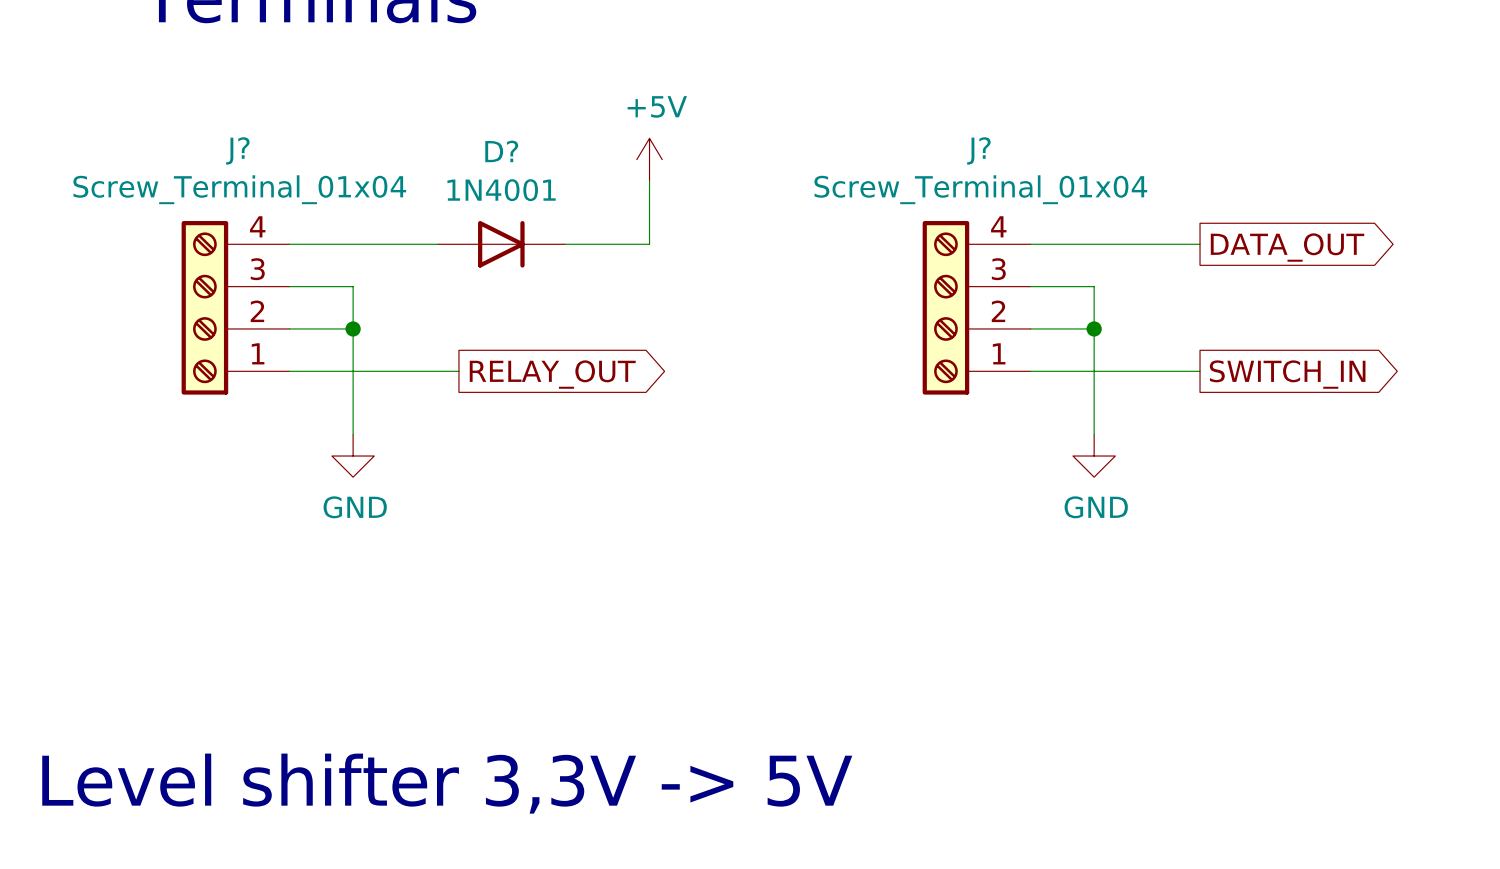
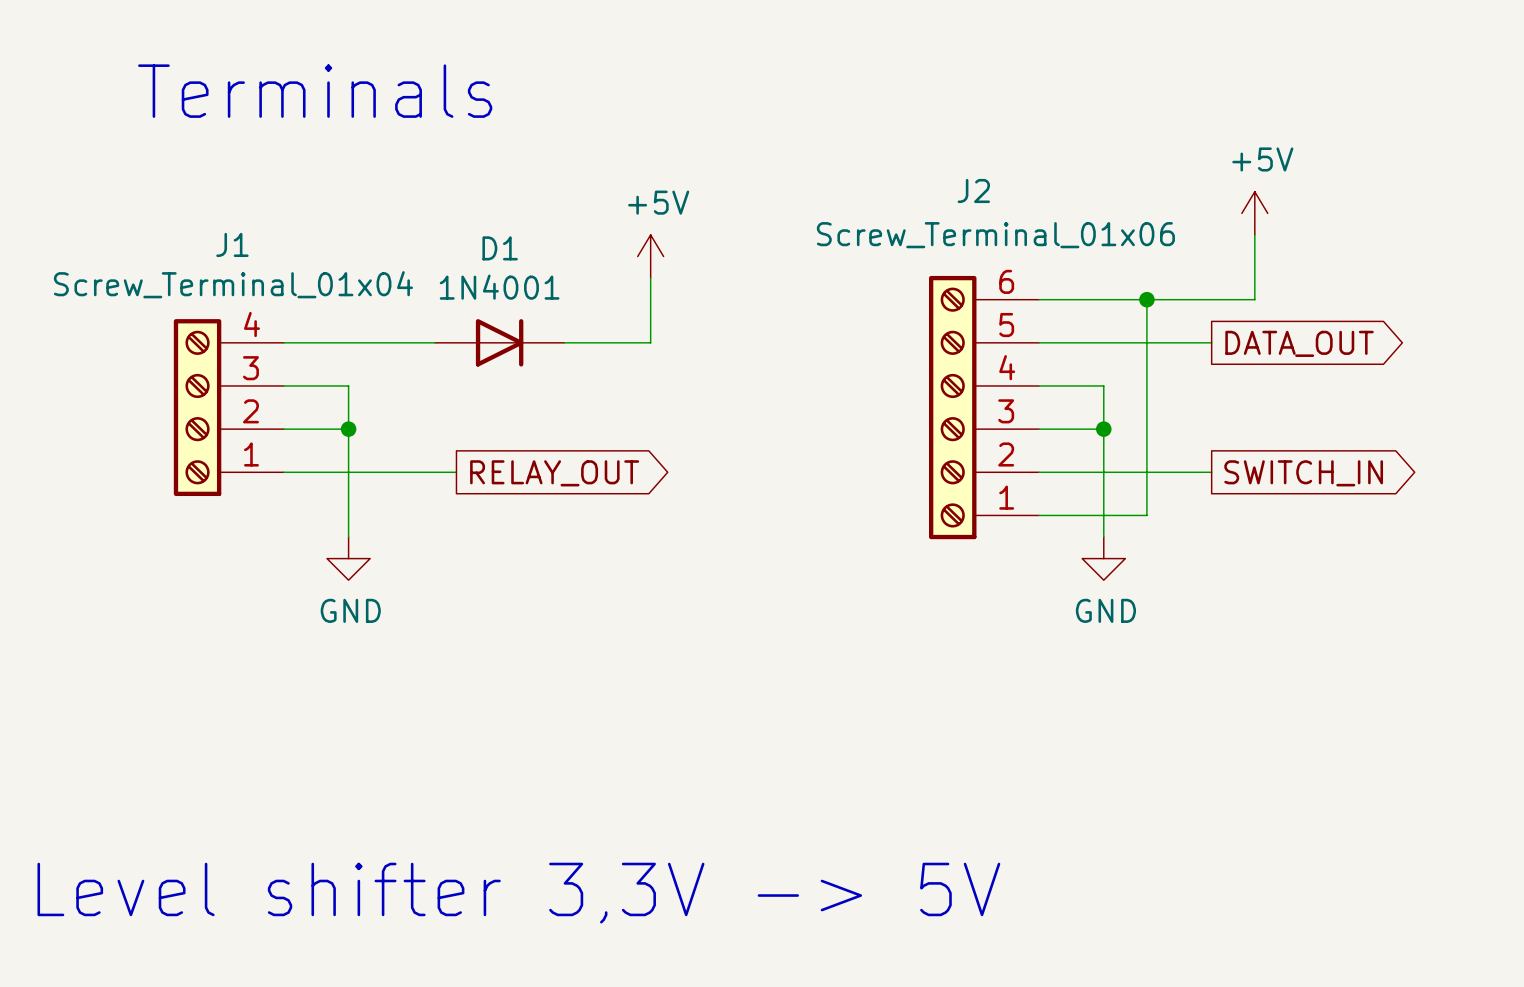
power symbol: none -> +5V (1254, 213)
wire: none -> (1254, 234) (1254, 299) (1039, 299)
J? name: J? (237, 150) -> J1 (232, 244)
D? name: D? (501, 151) -> D1 (500, 248)
wire: none -> (1146, 299) (1146, 515) (1039, 515)
junction: none -> (1146, 299)
J?: Screw_Terminal_01x04 (976, 307) -> none
J2: none -> Screw_Terminal_01x06 (984, 407)

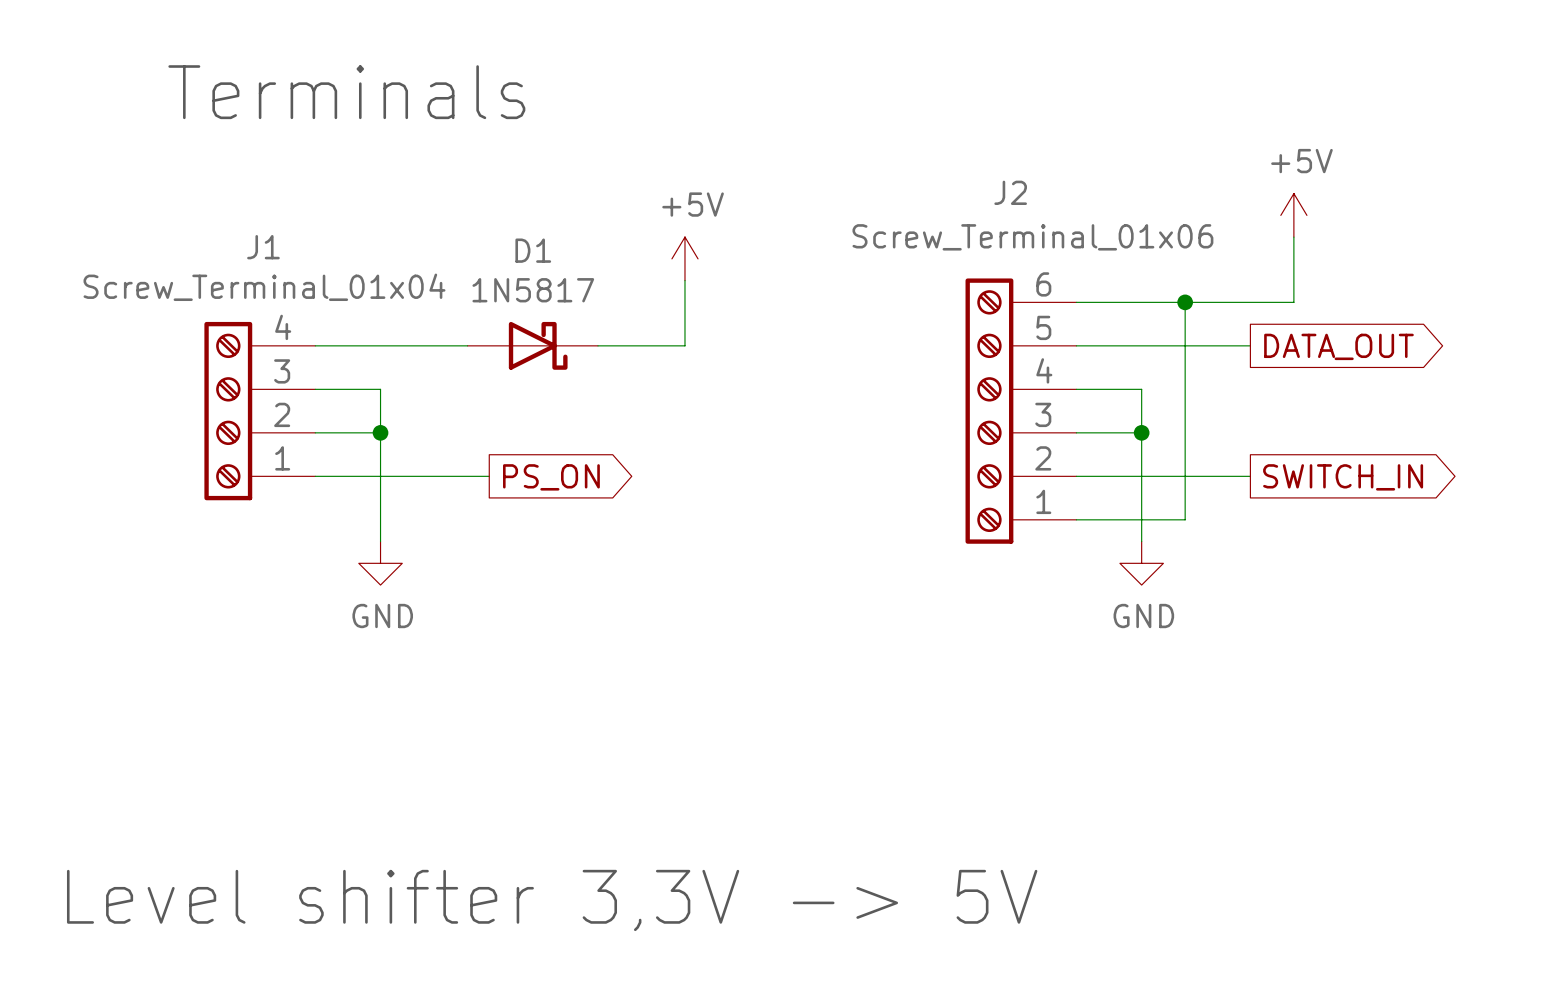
D1 value: 1N4001 (499, 287) -> 1N5817 (533, 290)
D1 symbol: [434, 319, 565, 367] -> [467, 321, 599, 370]
global label: RELAY_OUT (554, 473) -> PS_ON (551, 477)

